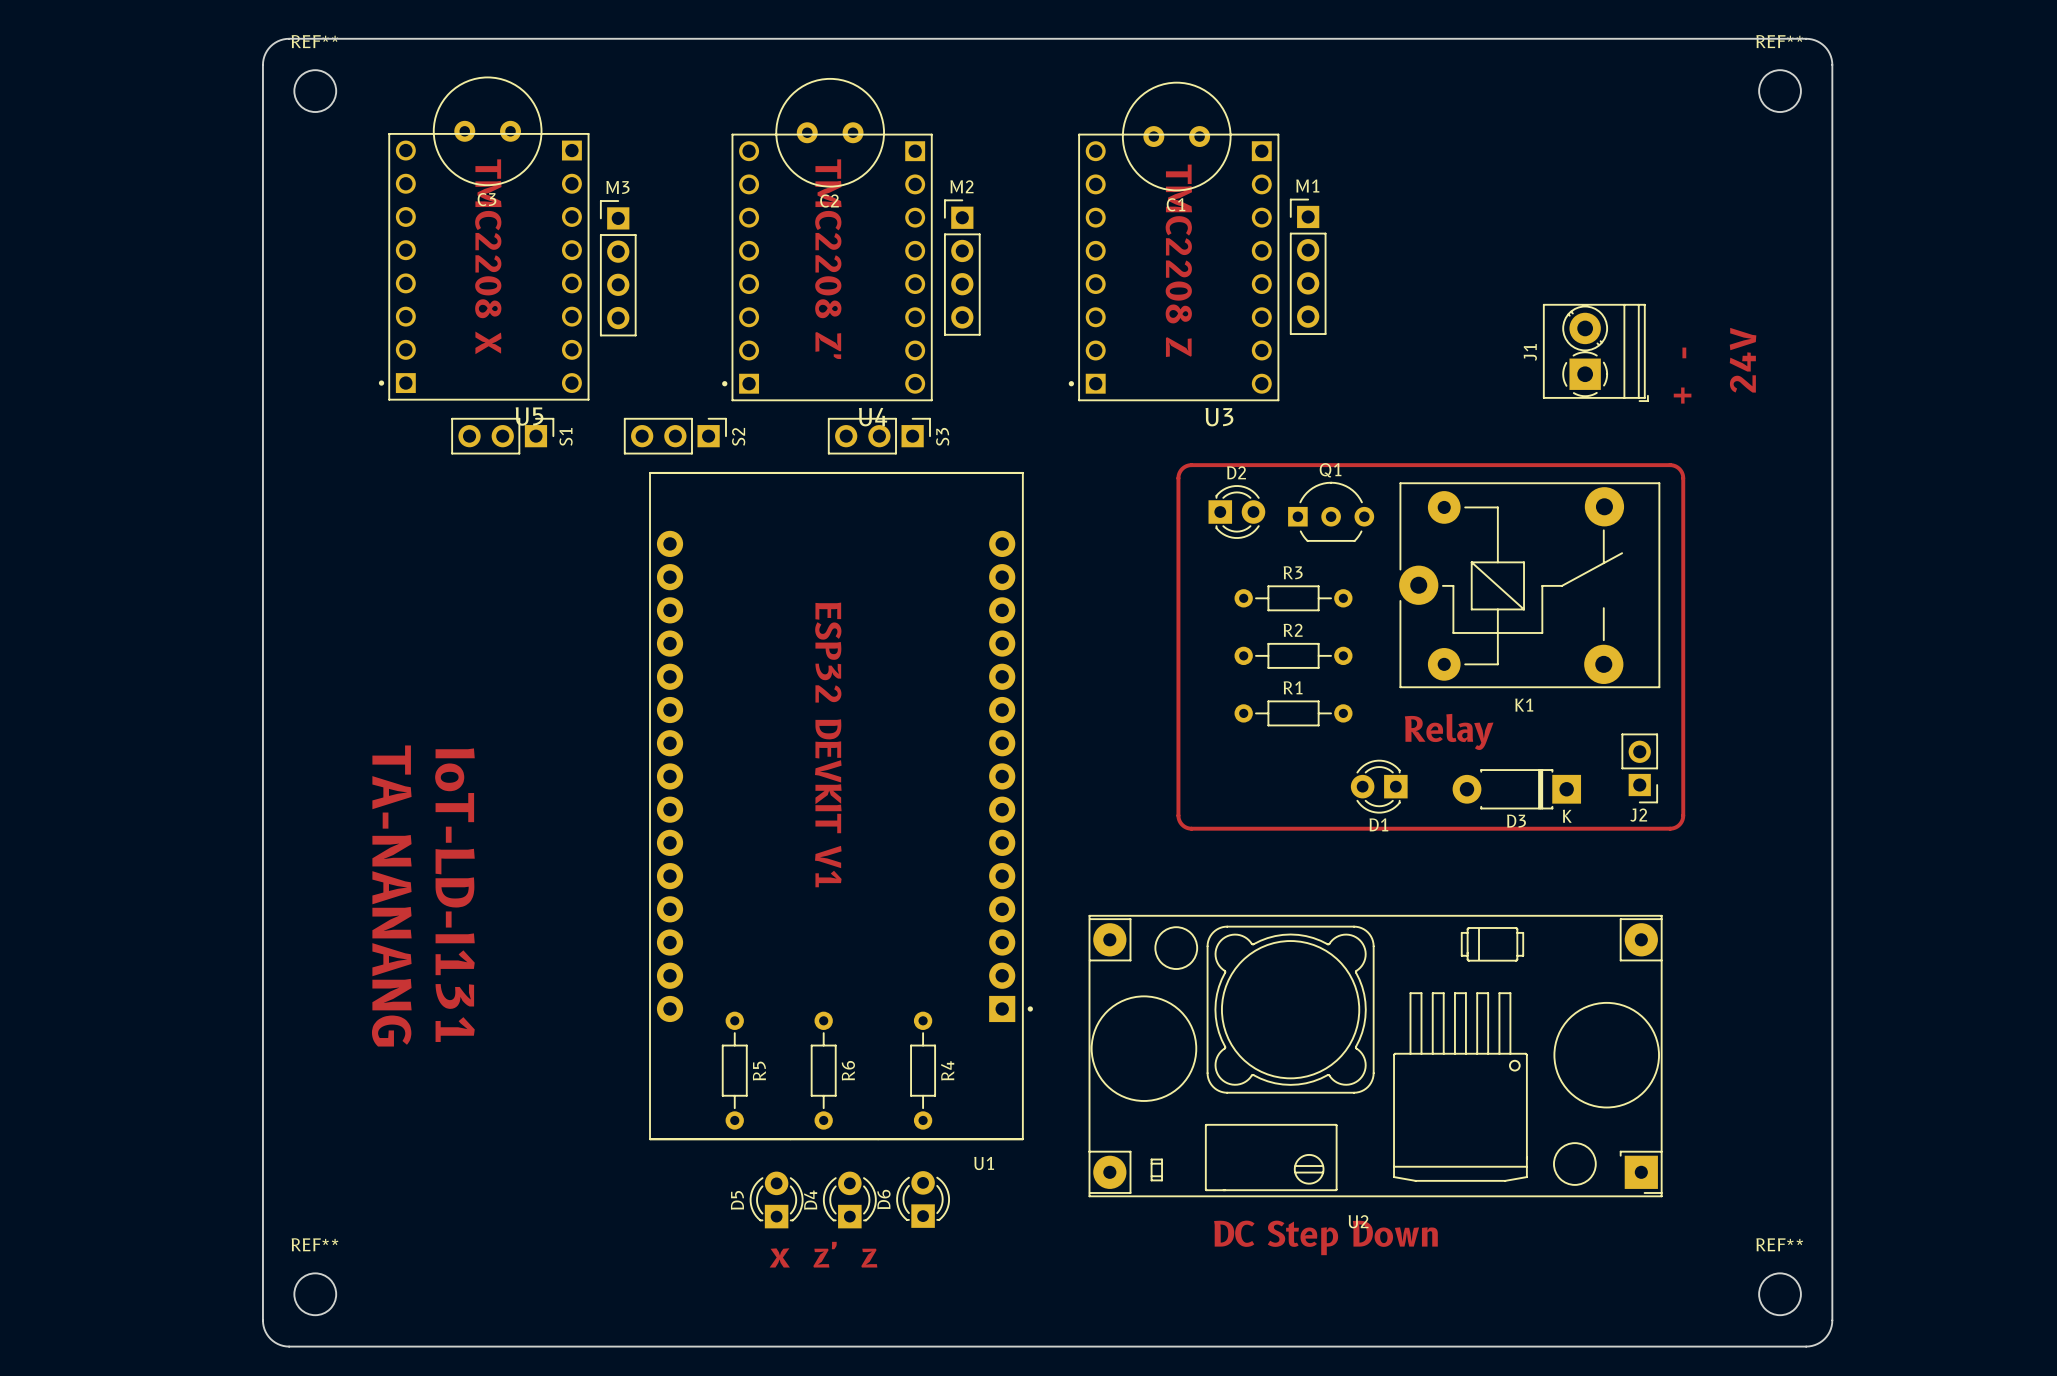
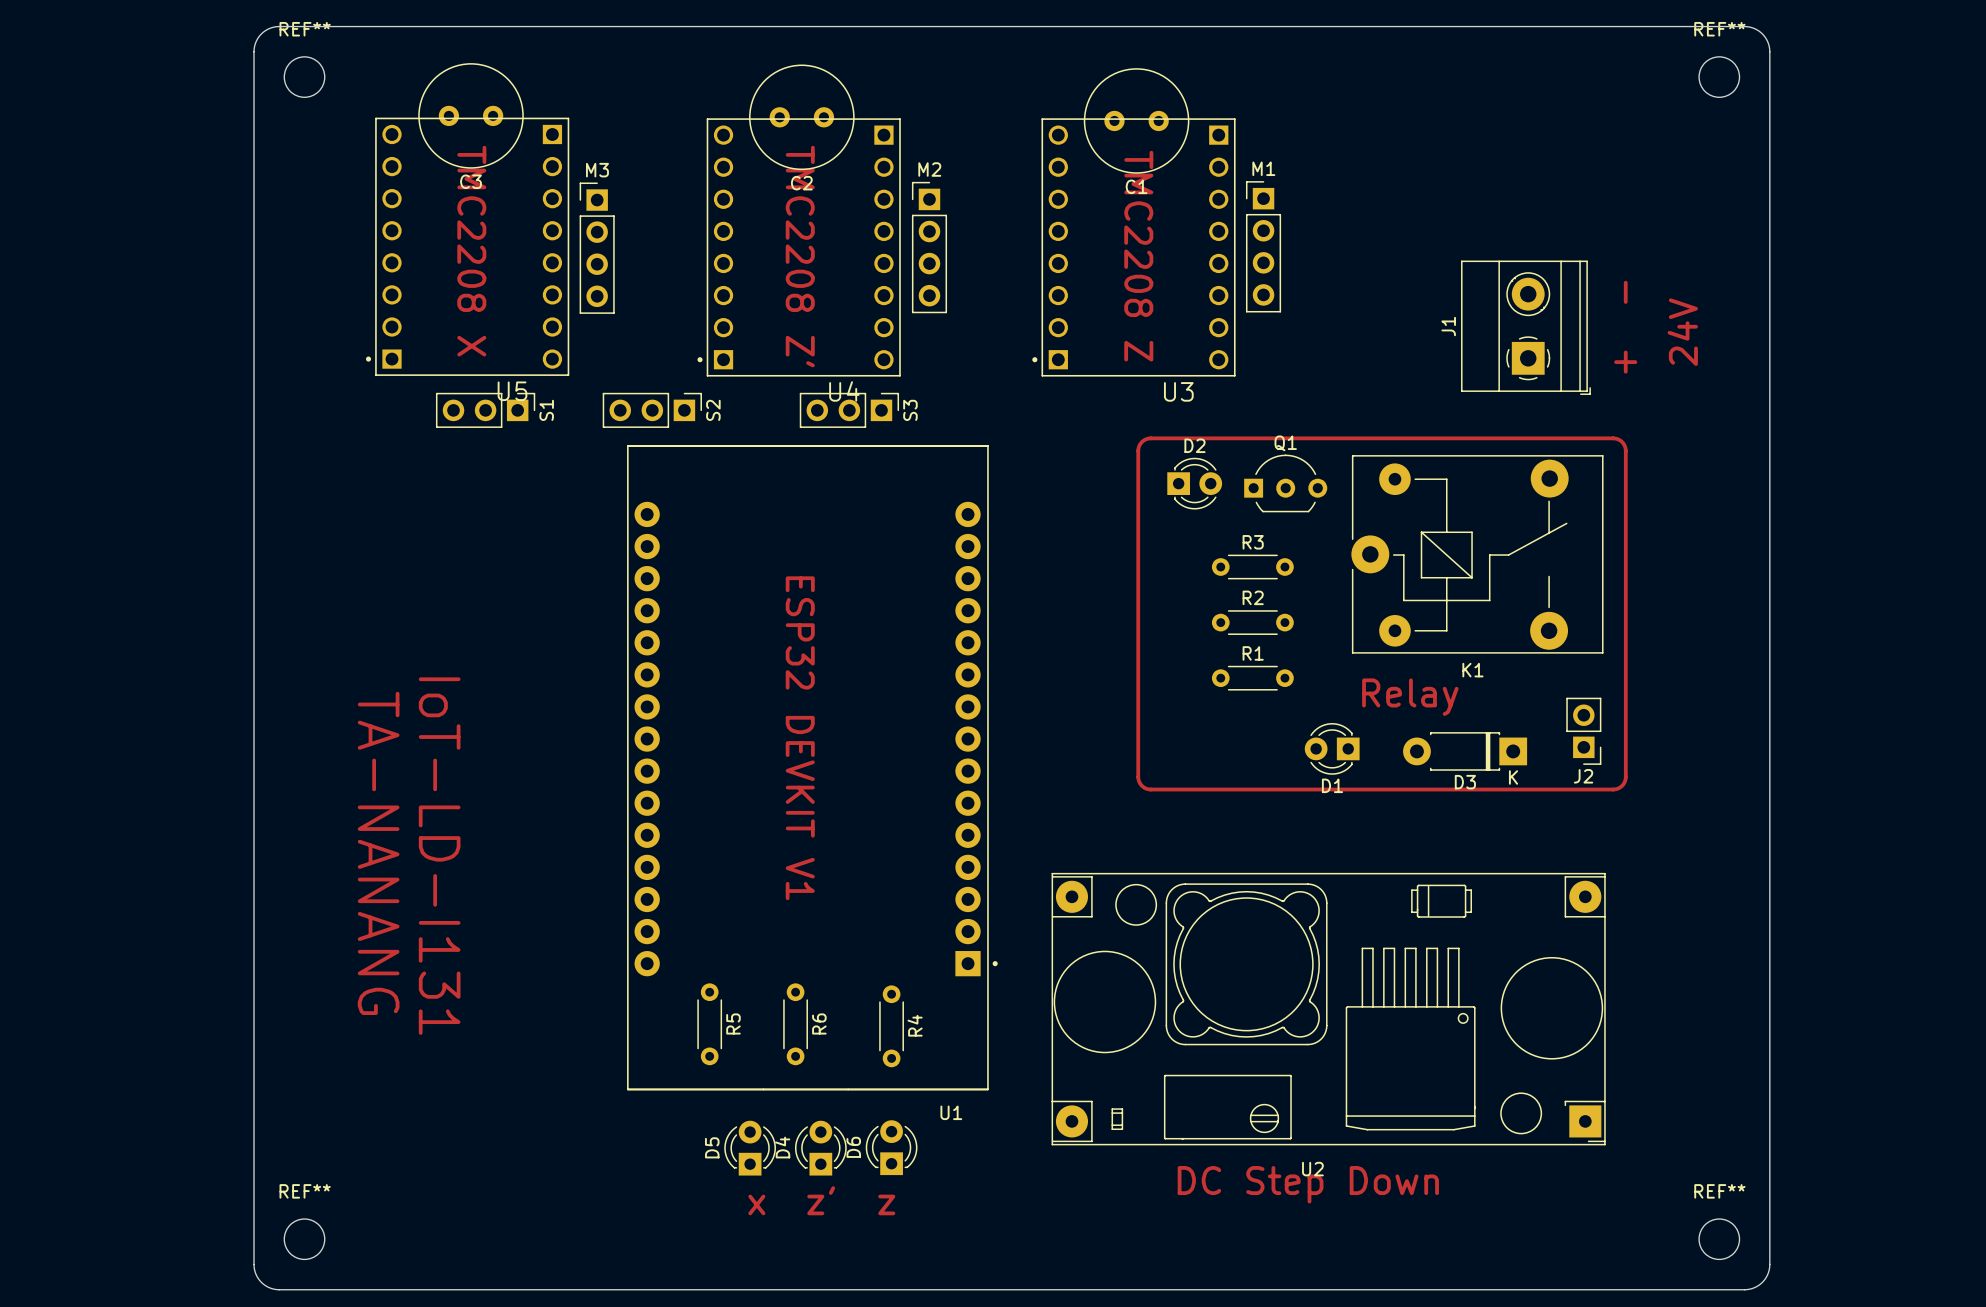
J1 footprint: [1543, 304, 1649, 402] -> [1461, 260, 1591, 395]
R3 footprint: [1234, 585, 1353, 612] -> [1211, 554, 1294, 580]
R2 footprint: [1234, 643, 1353, 669] -> [1211, 610, 1294, 635]
R1 footprint: [1234, 700, 1353, 727] -> [1211, 665, 1294, 691]
R5 footprint: [721, 1011, 748, 1130] -> [697, 983, 723, 1066]
R6 footprint: [810, 1011, 837, 1130] -> [783, 983, 808, 1066]
R4 footprint: [910, 1011, 936, 1130] -> [879, 985, 904, 1068]

